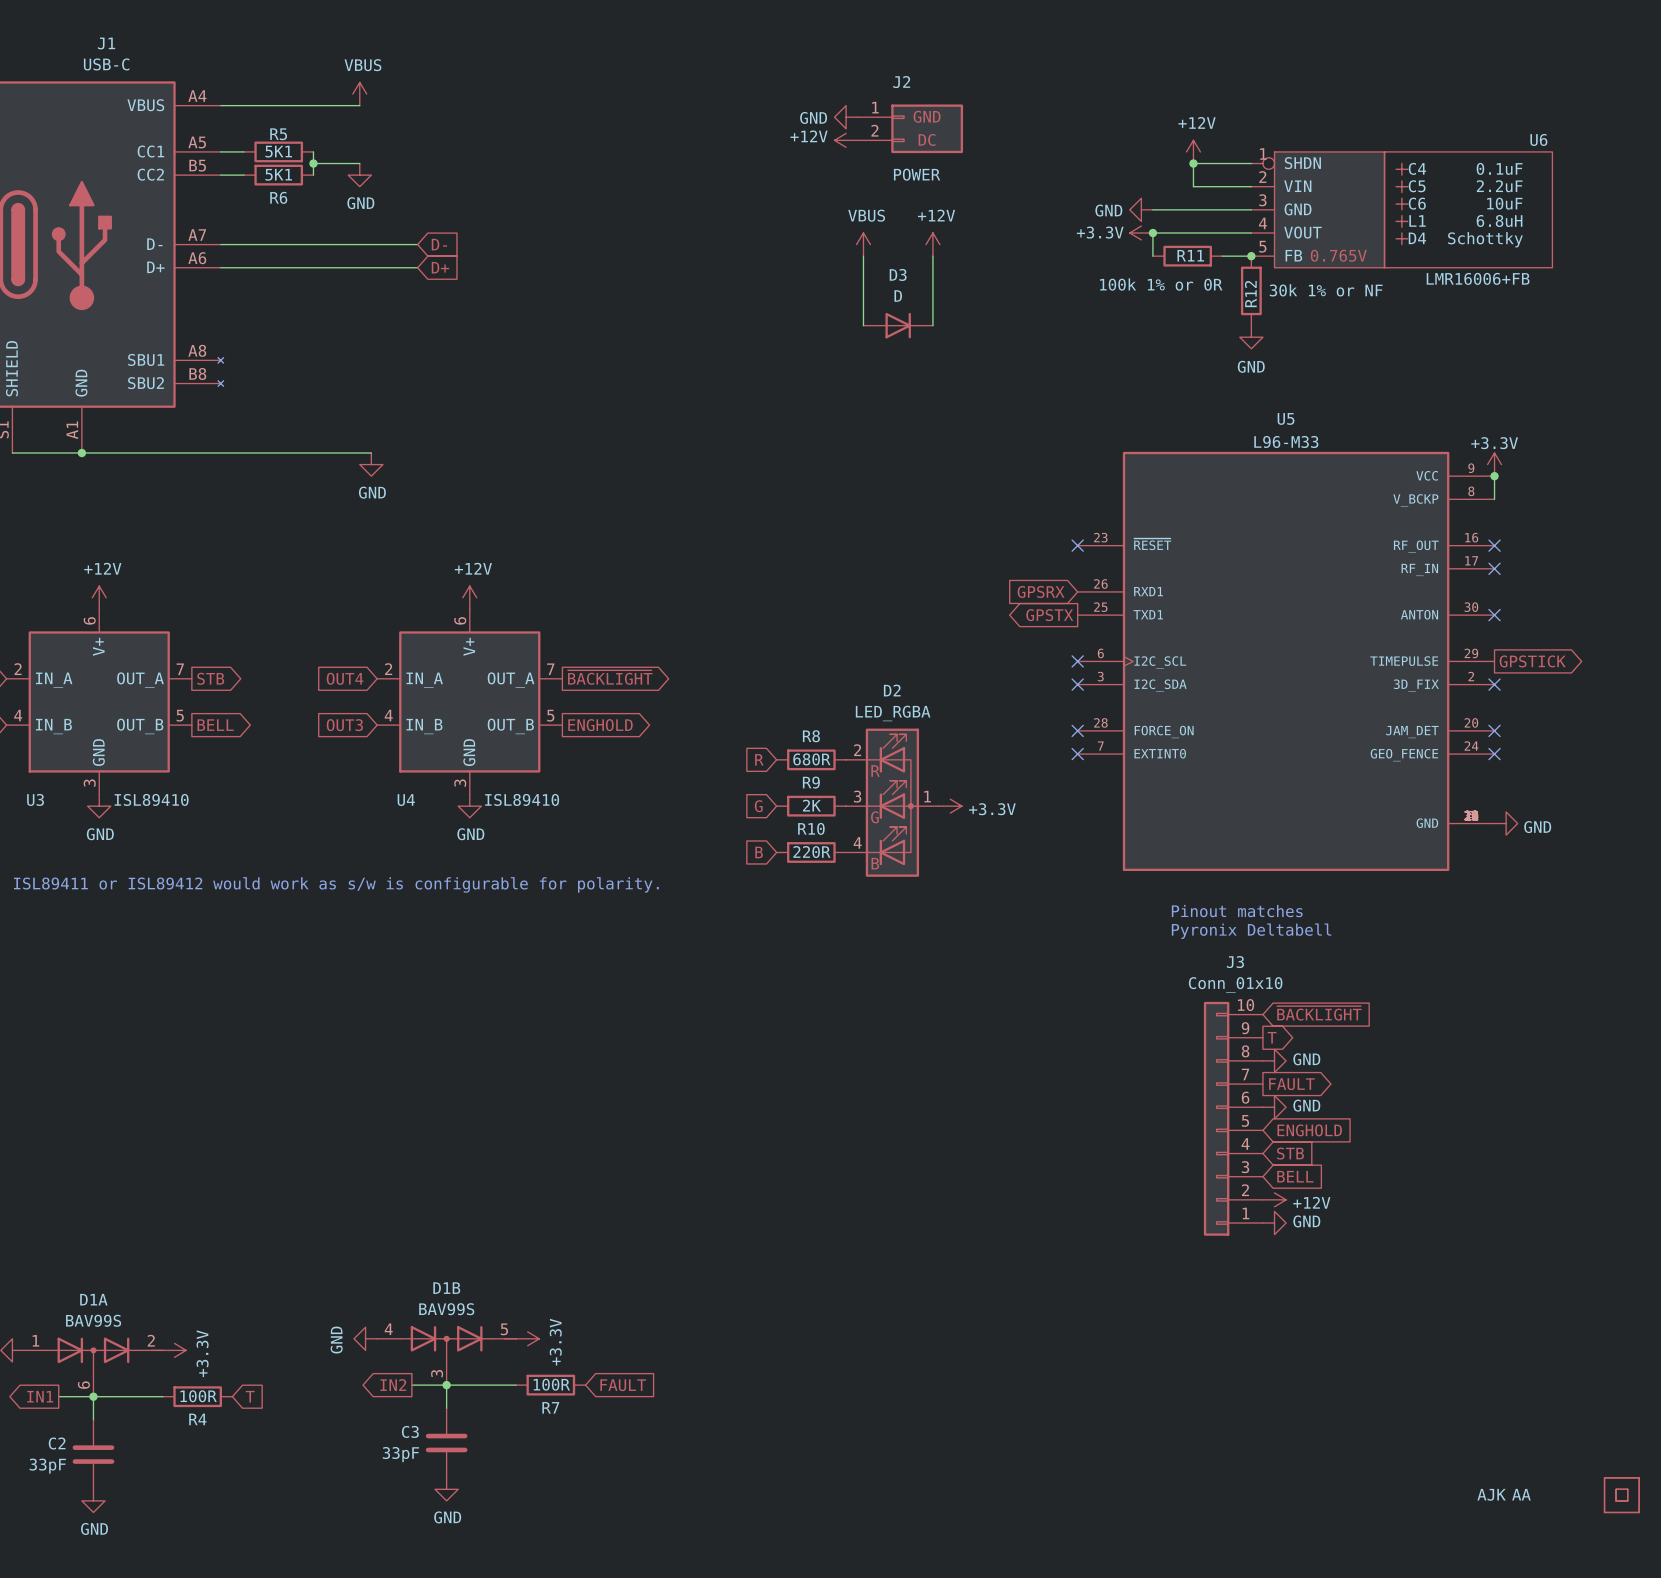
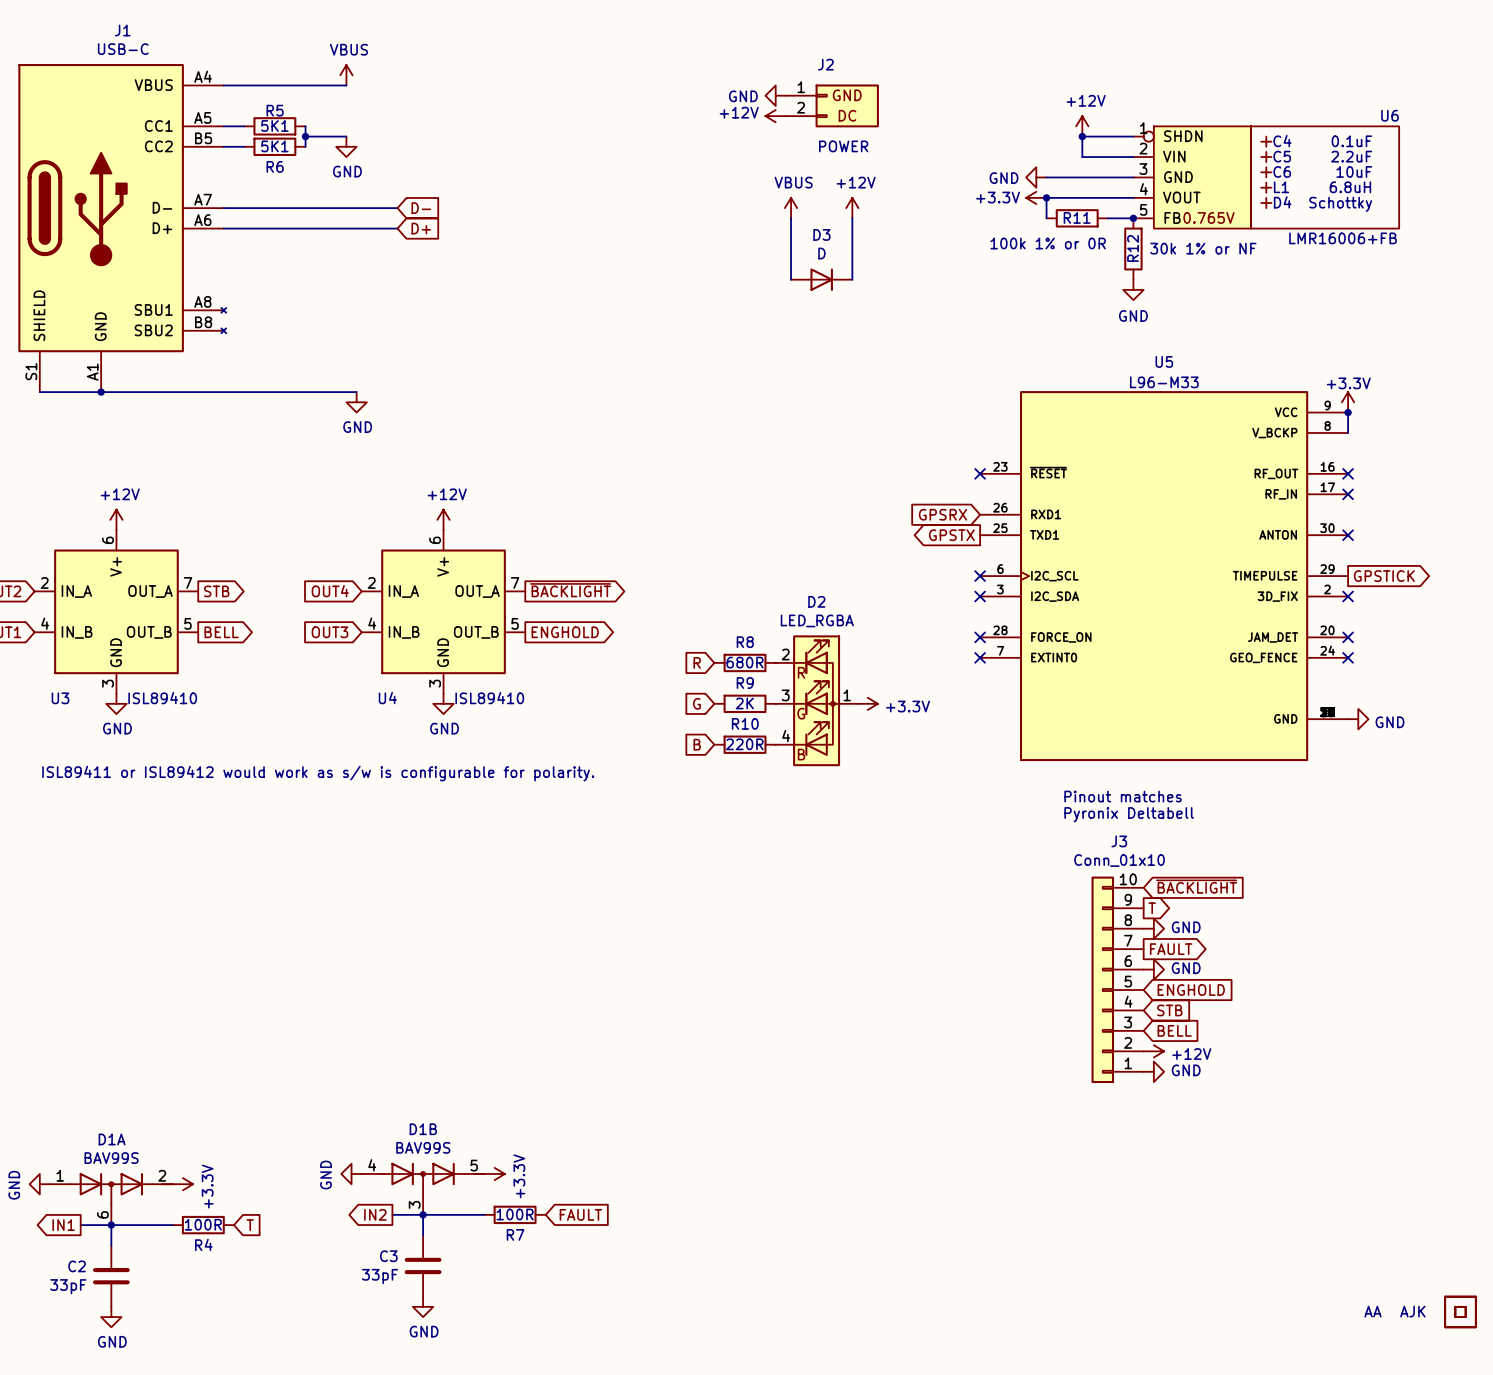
part position: (1491, 1494) -> (1412, 1311)

